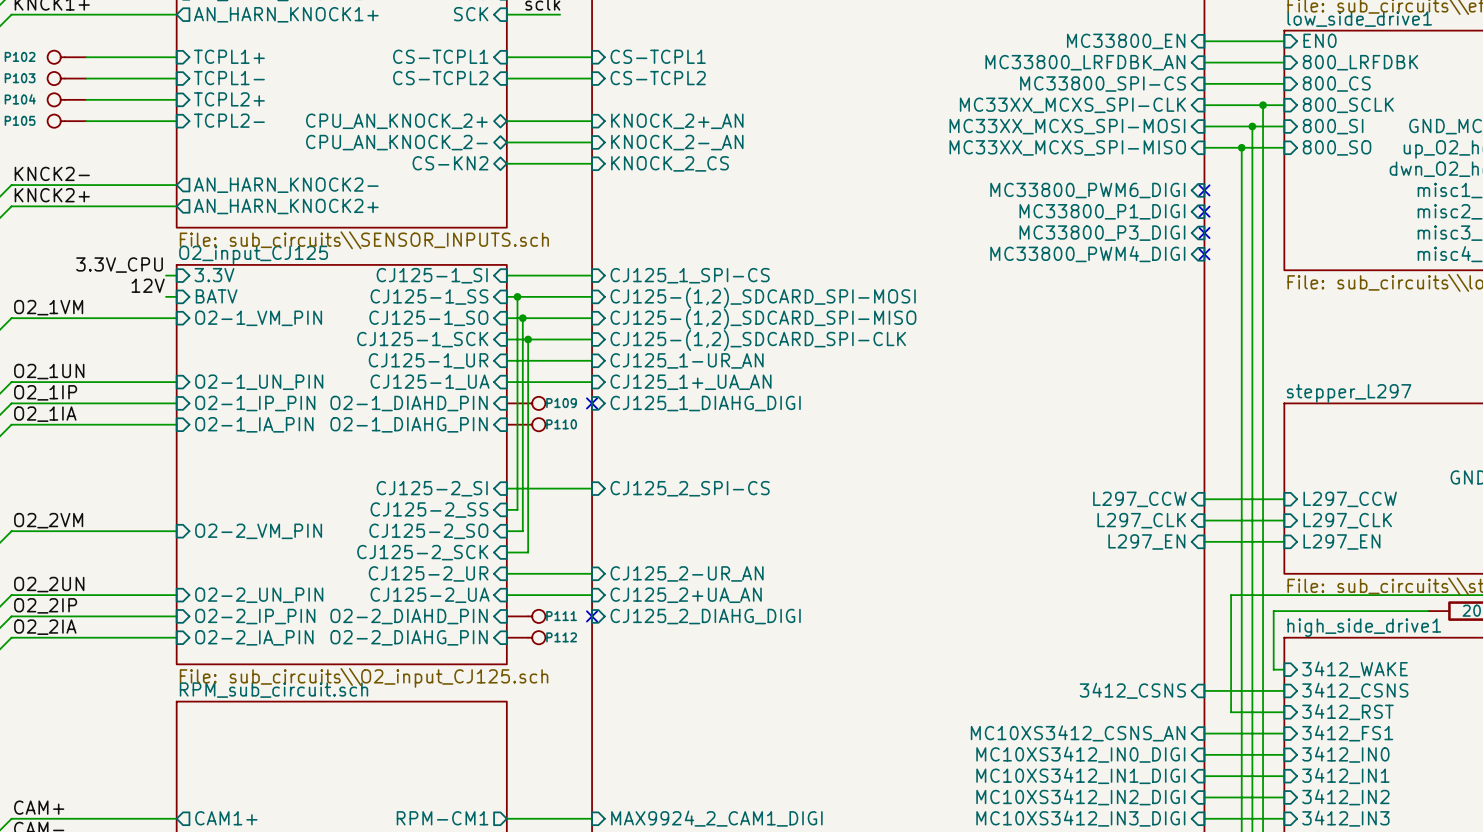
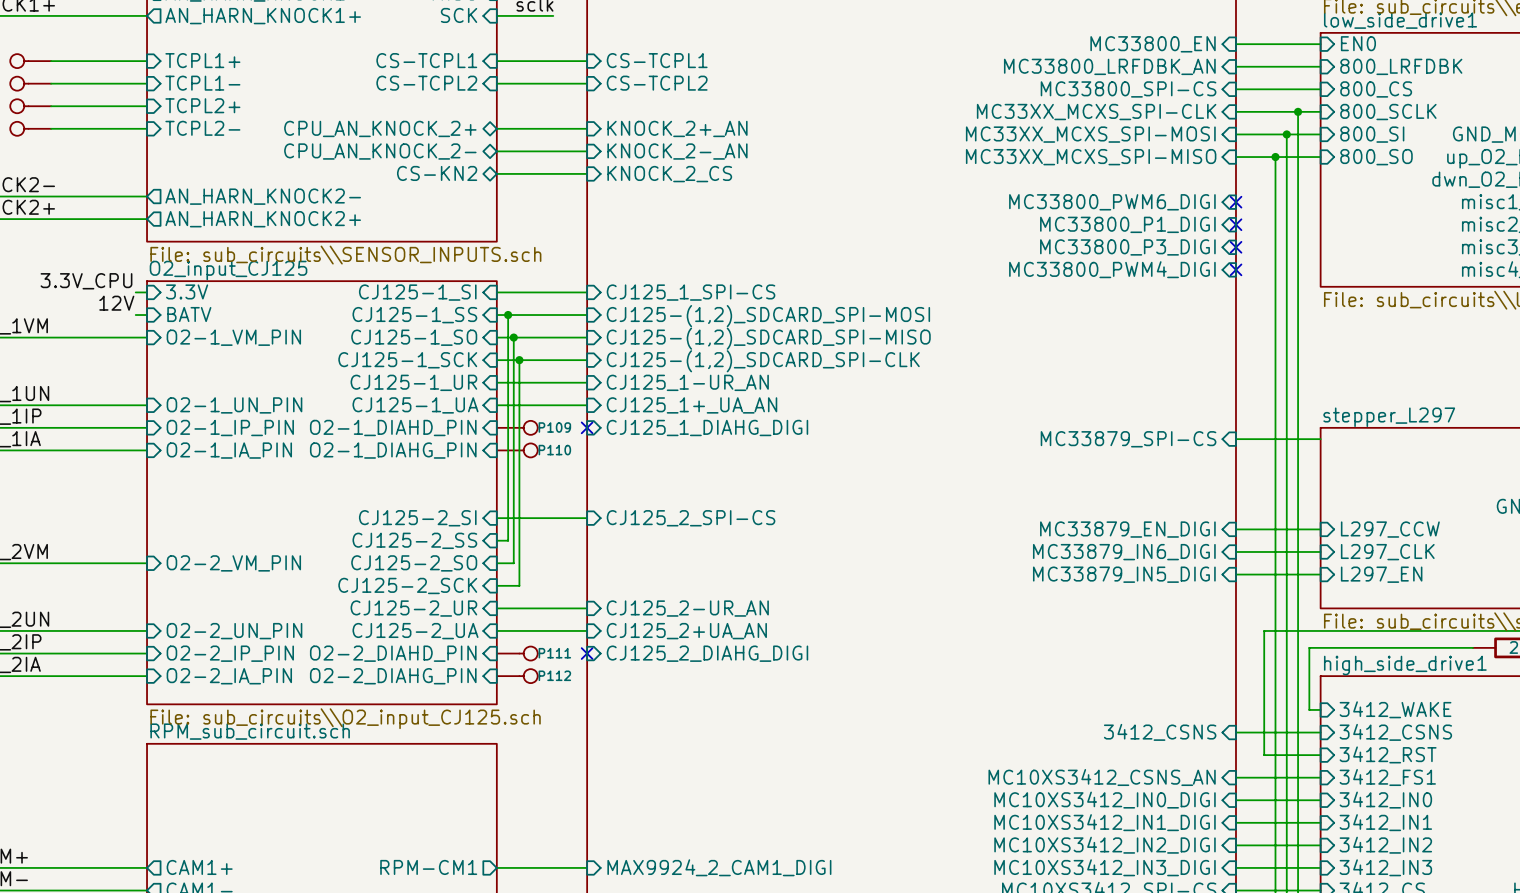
sheet pin: none -> MC33879_SPI-CS (1128, 439)
wire: none -> (1235, 439) (1320, 439)
sheet pin: L297_CCW (1139, 499) -> MC33879_EN_DIGI (1127, 529)
sheet pin: L297_CLK (1141, 520) -> MC33879_IN6_DIGI (1124, 552)
sheet pin: L297_EN (1146, 541) -> MC33879_IN5_DIGI (1124, 574)

